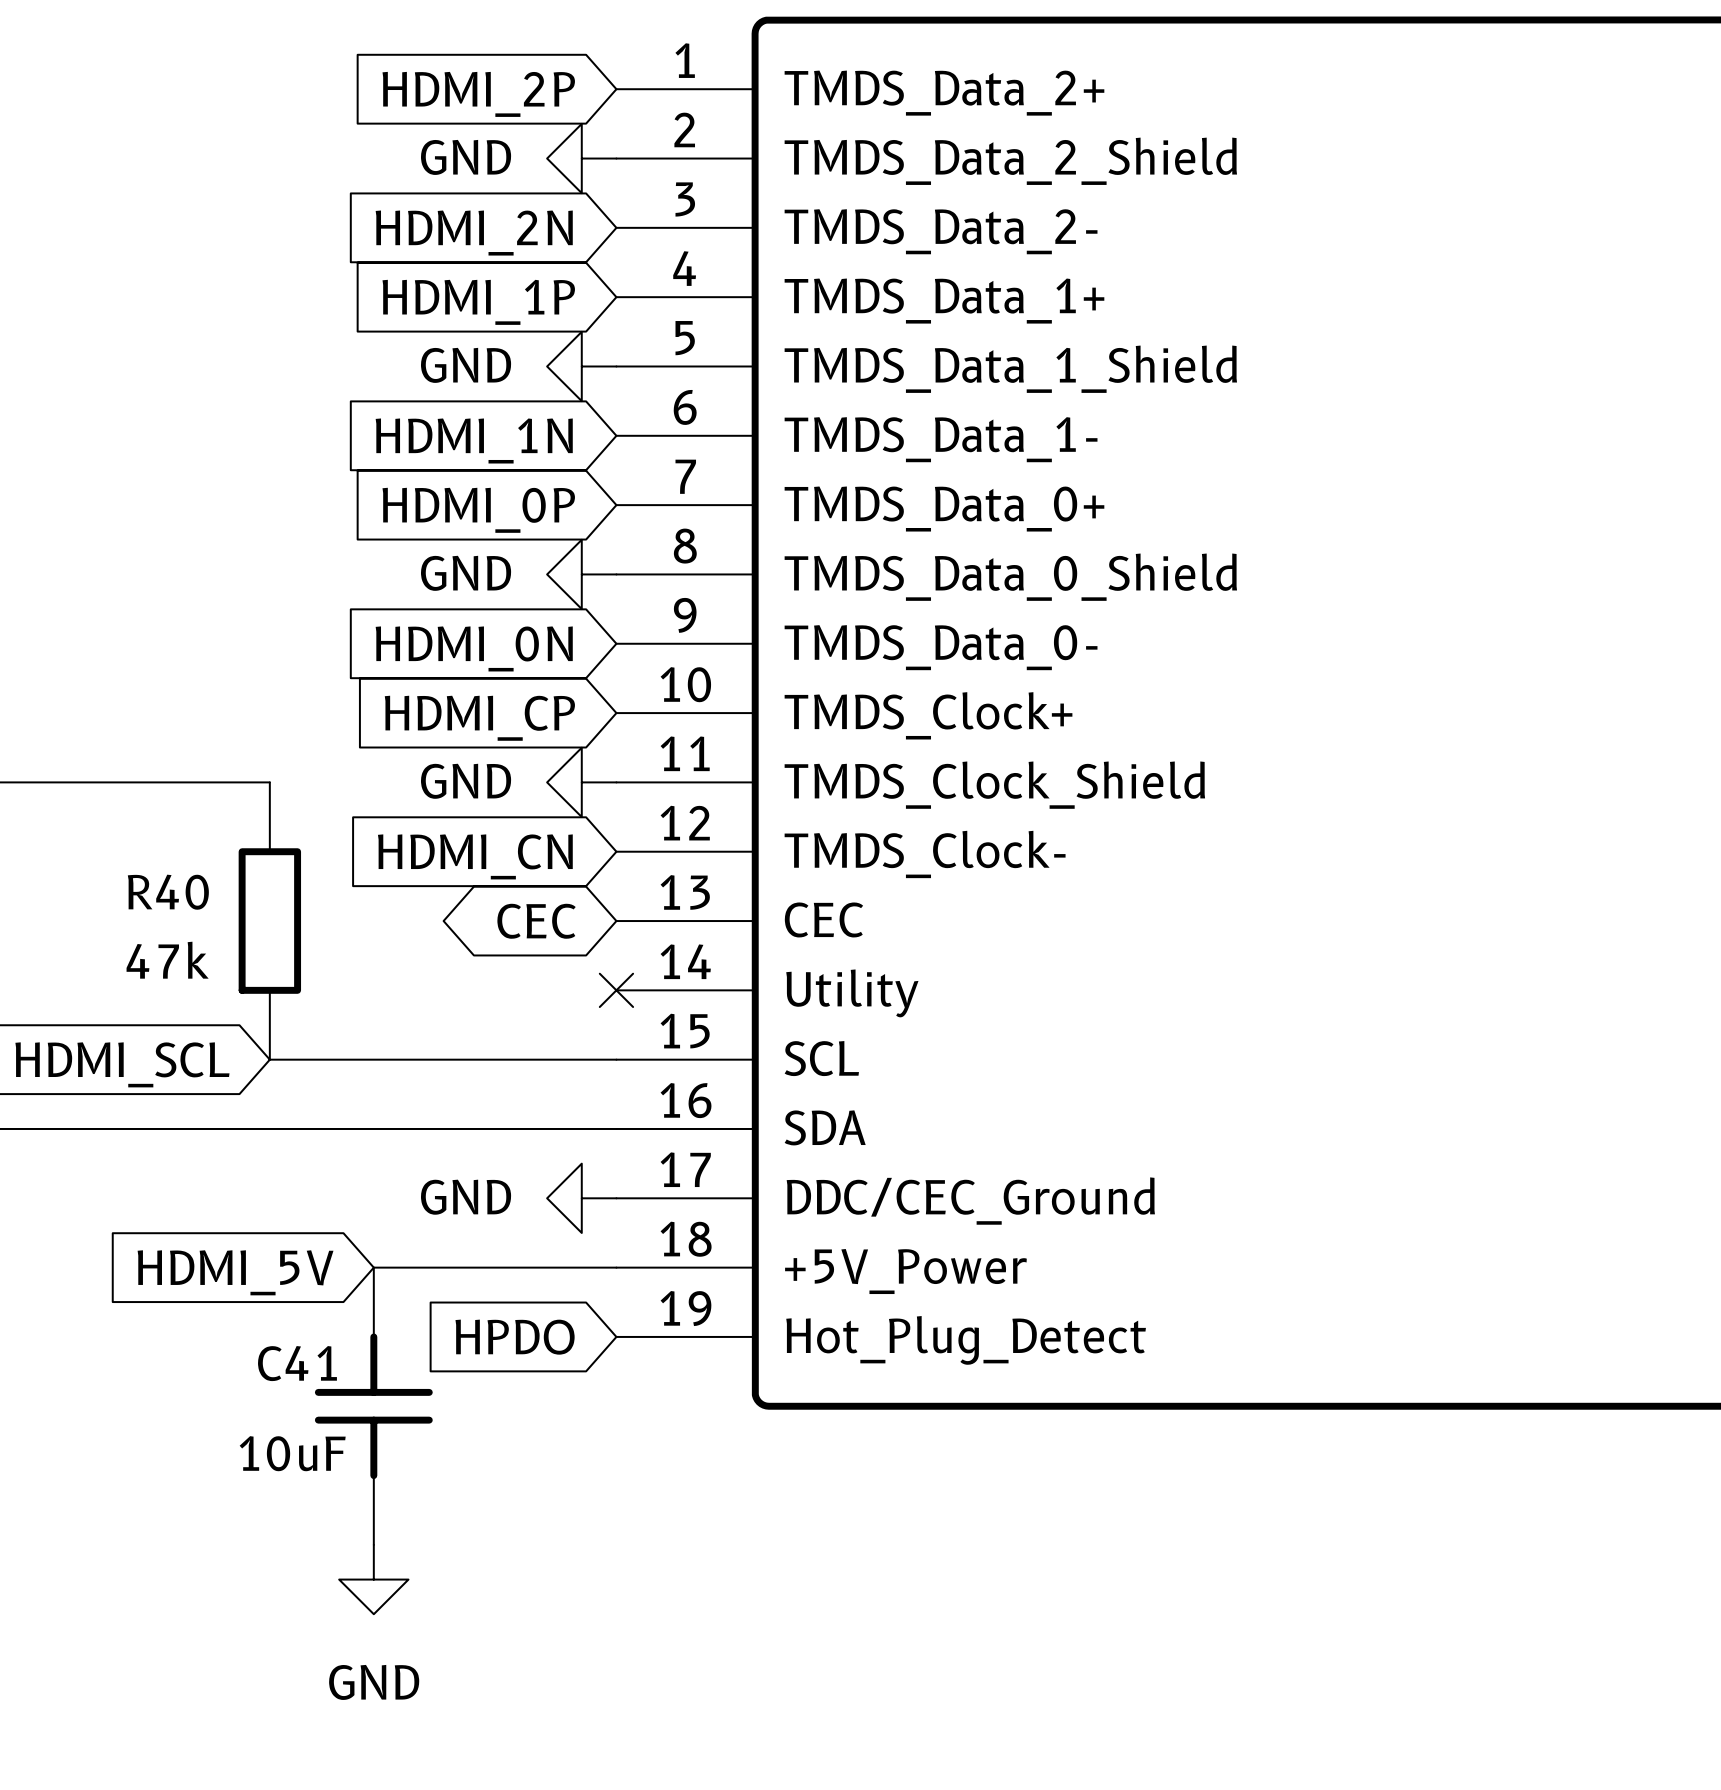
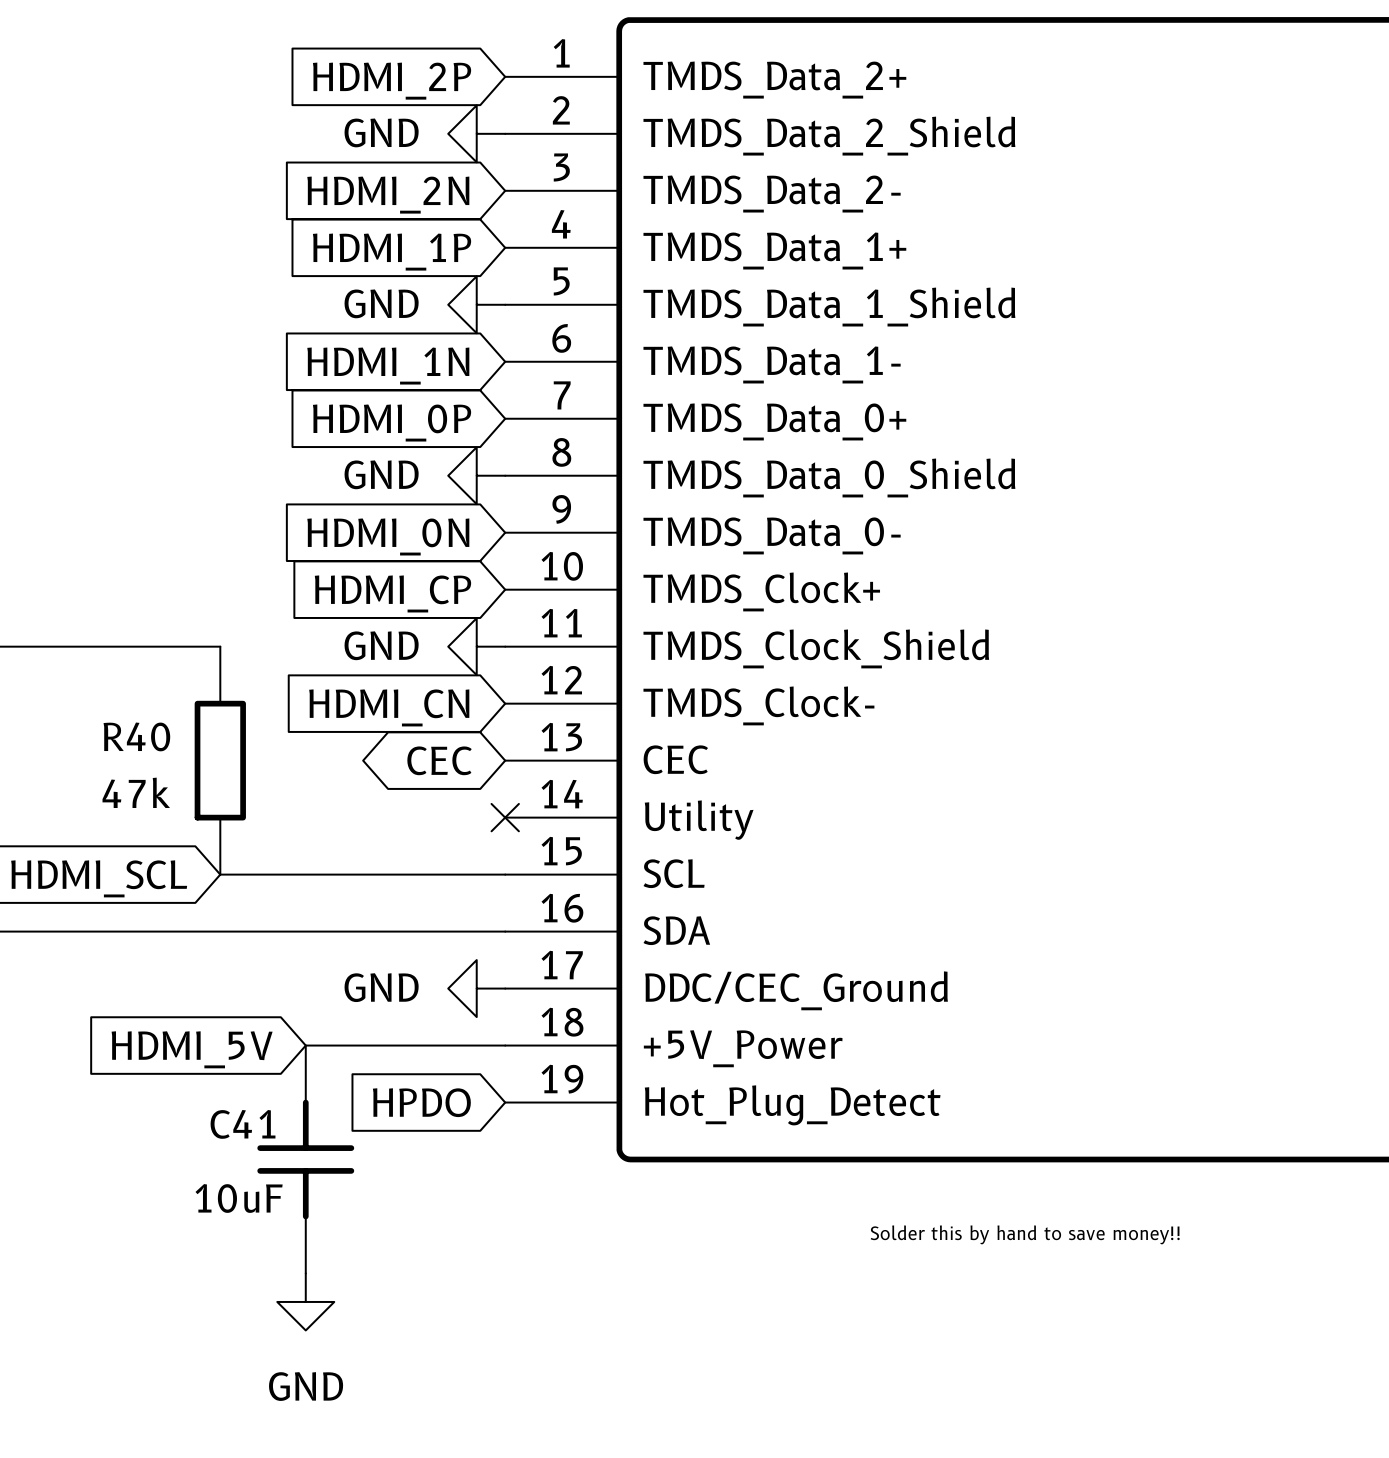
text: none -> Solder this by hand to save money!! (1025, 1234)

